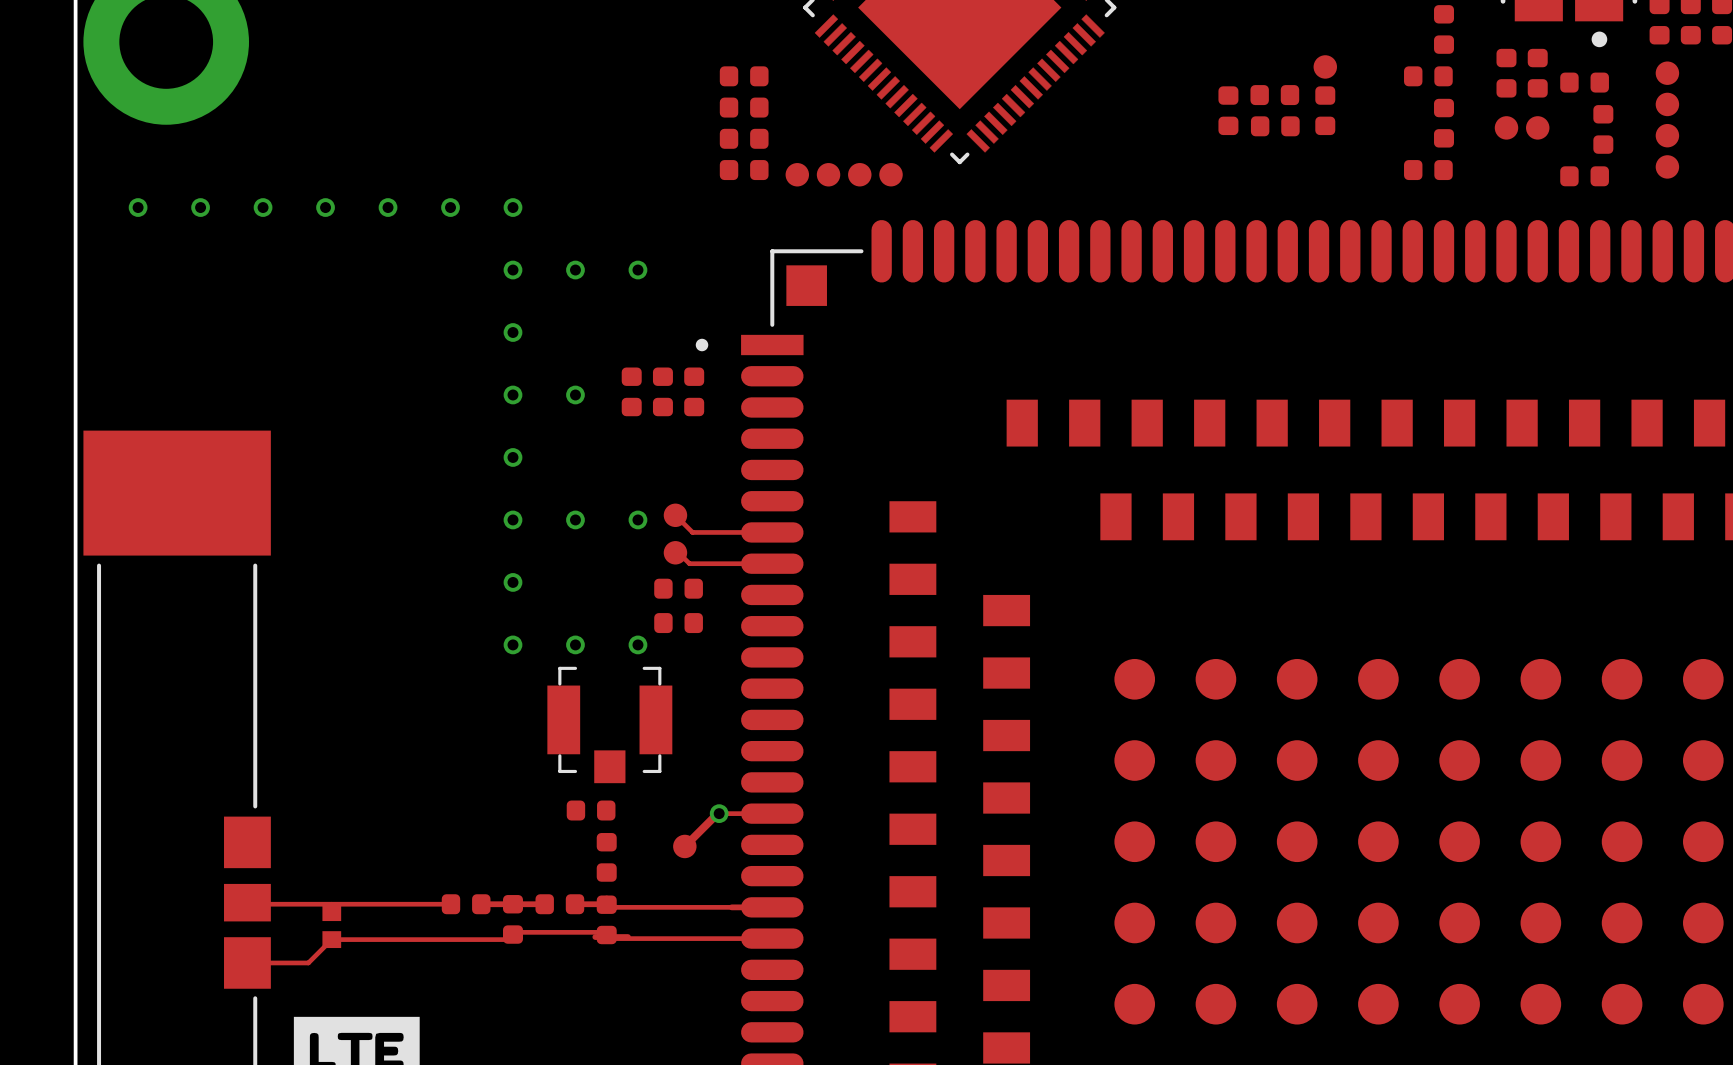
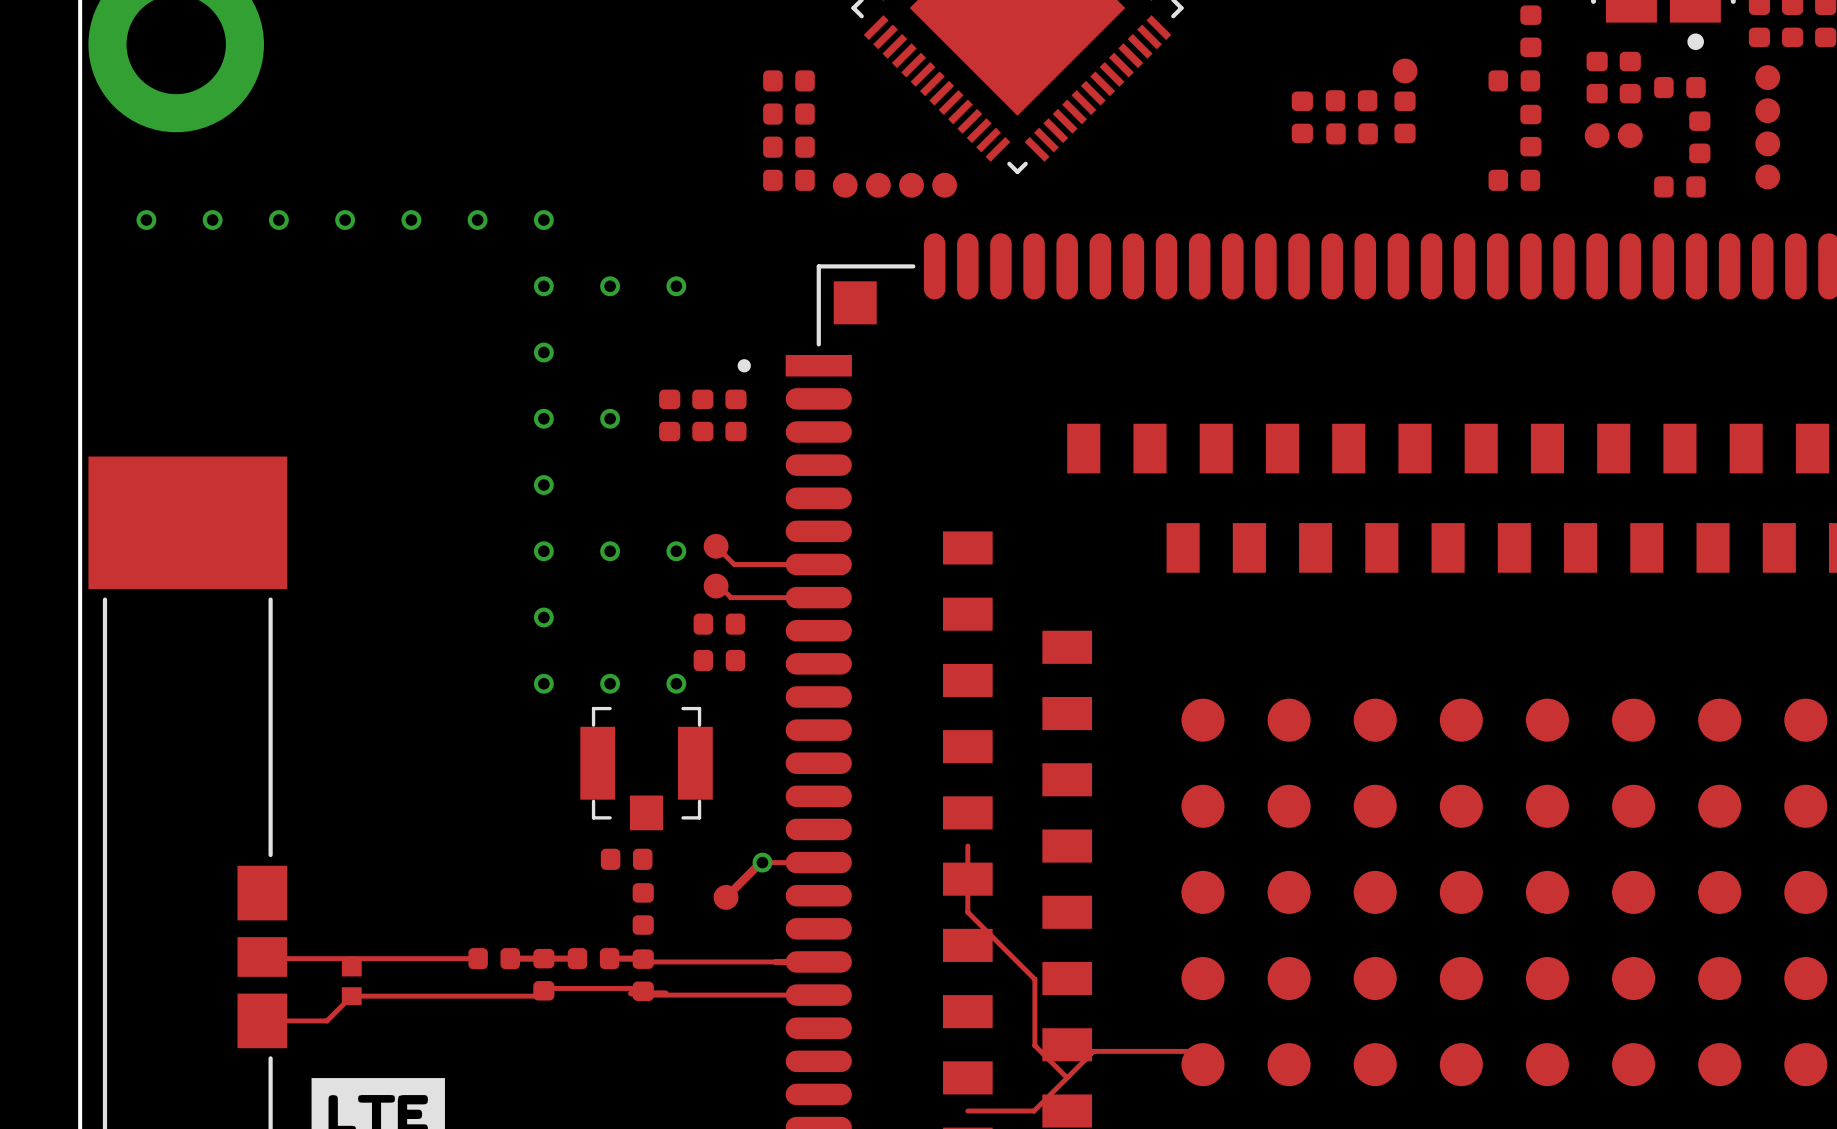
track: none -> (967, 846) (967, 912) (1034, 979) (1034, 1045) (1067, 1077)
track: none -> (1202, 1051) (1093, 1051) (1034, 1111) (967, 1111)

